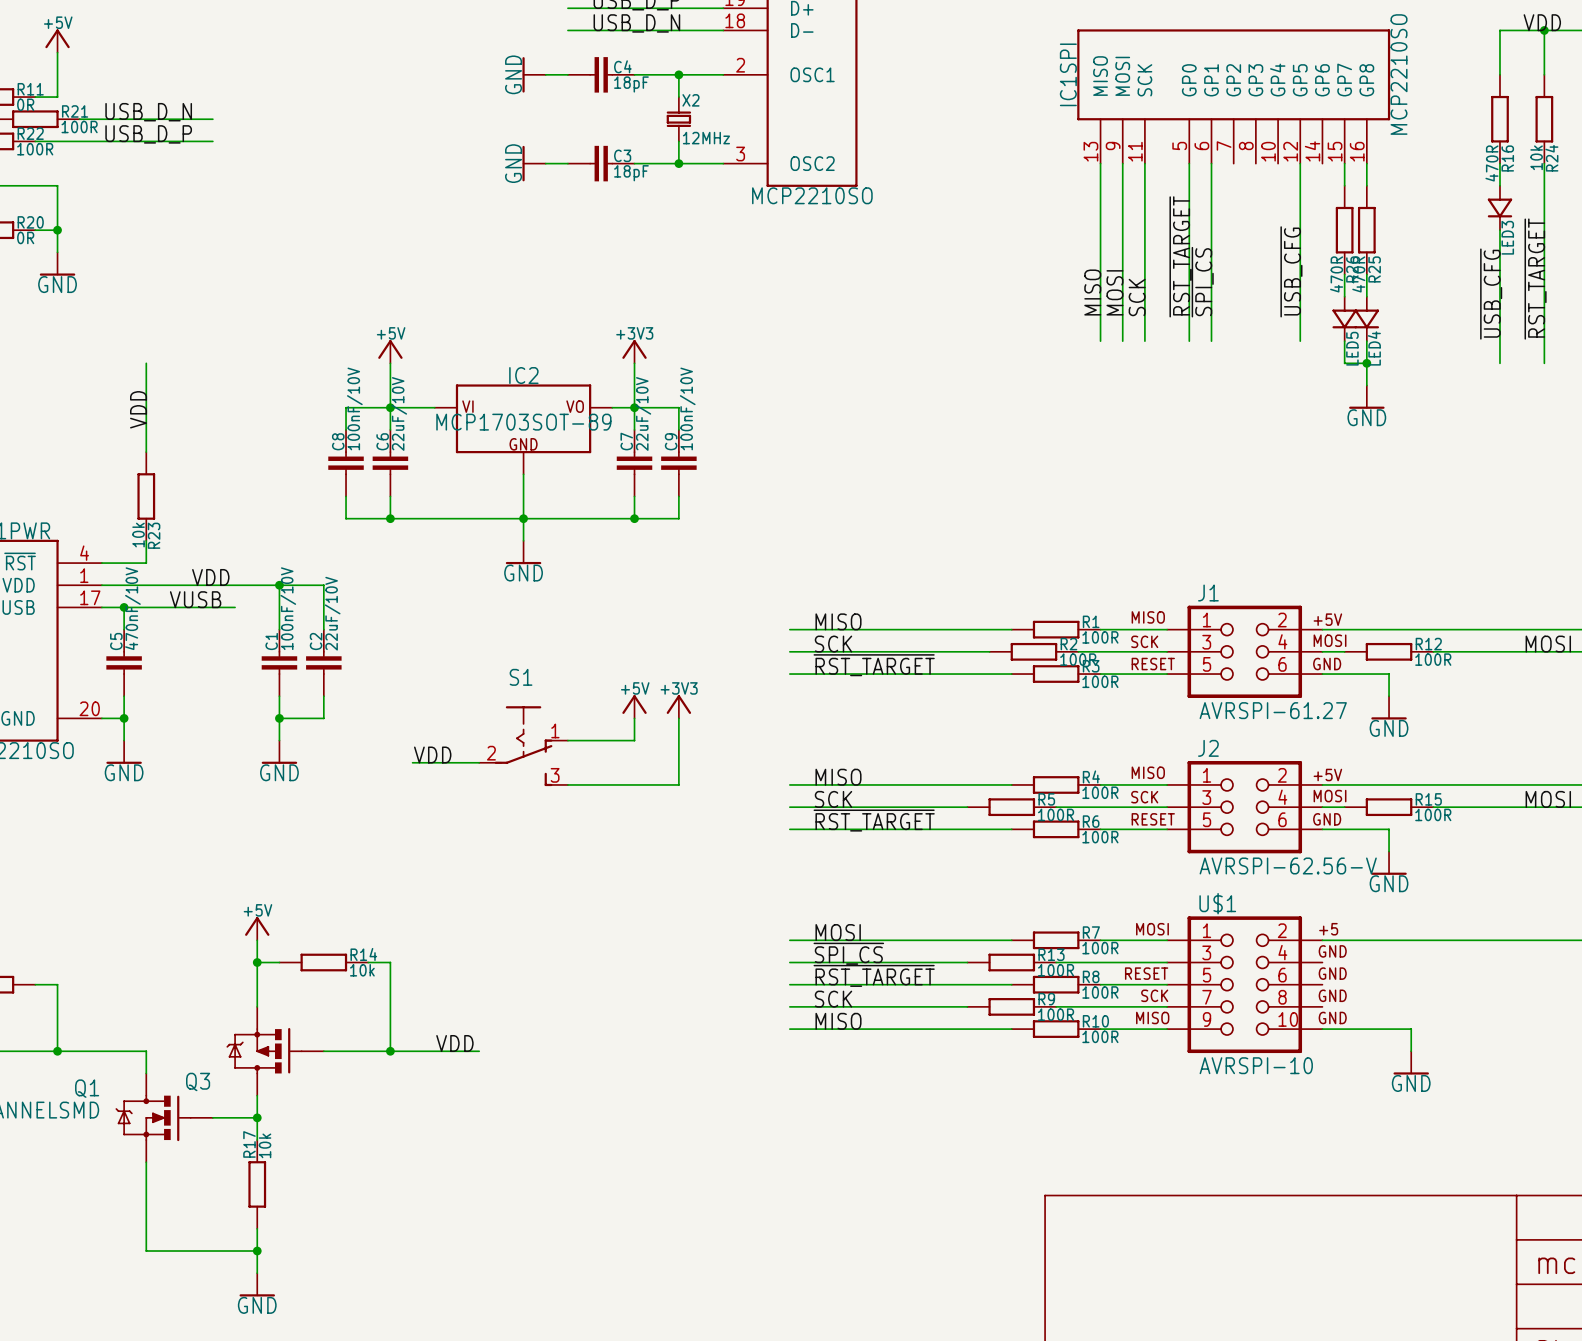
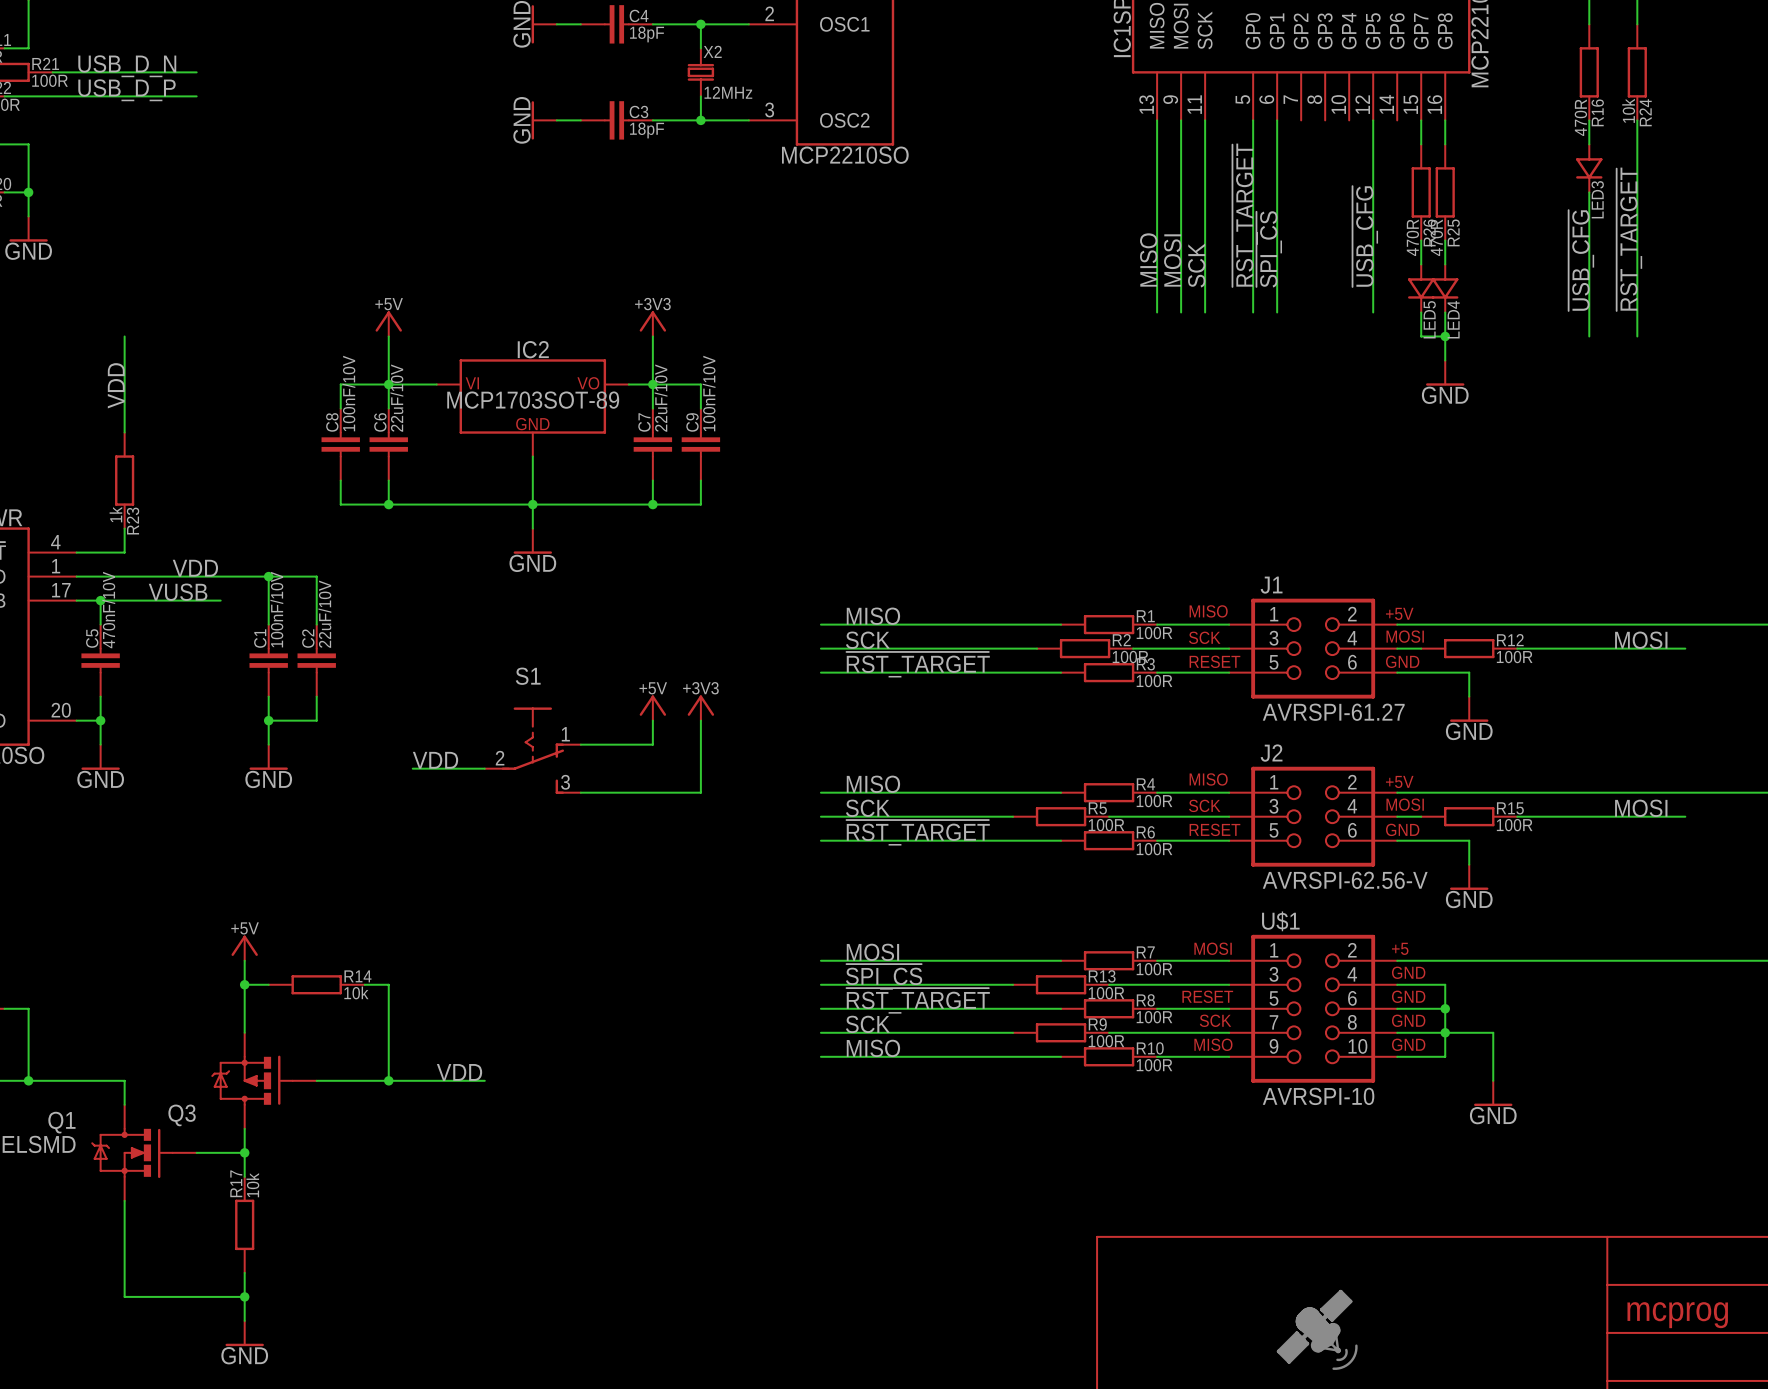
R23 value: 10k (138, 535) -> 1k (115, 514)
wire: none -> (1397, 984) (1445, 984) (1445, 1056)
wire: none -> (1397, 1008) (1445, 1008)
junction: none -> (1445, 1008)
junction: none -> (1445, 1032)
wire: (1366, 1029) (1411, 1029) -> (1397, 1032) (1493, 1032) (1493, 1056)
part: none -> (1317, 1329)

